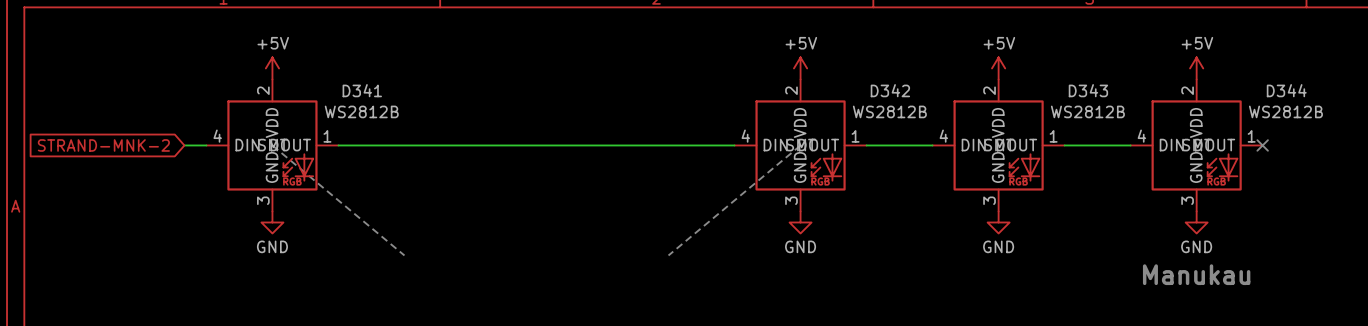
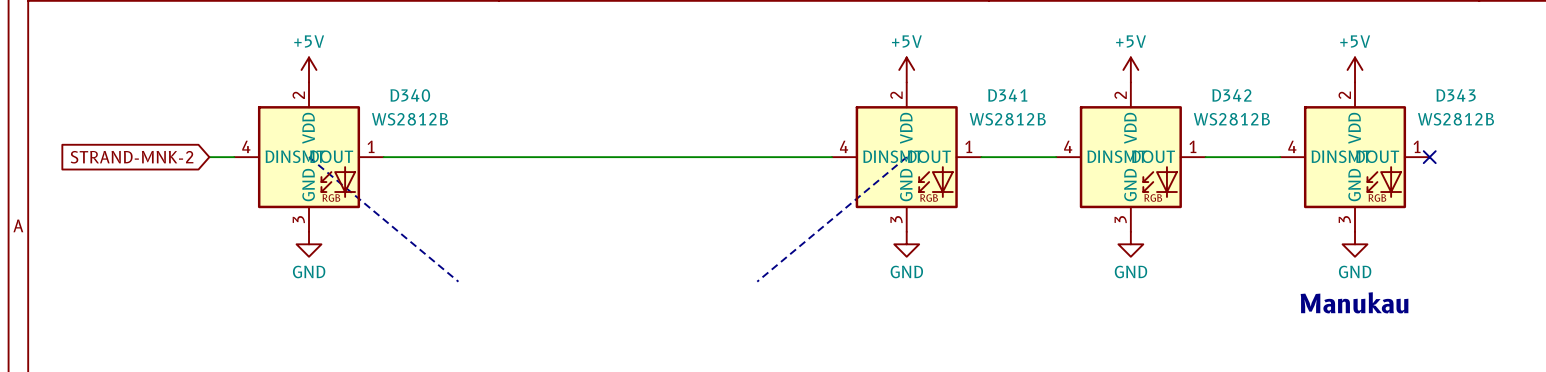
D341 name: D341 (362, 90) -> D340 (410, 95)
D342 name: D342 (890, 90) -> D341 (1007, 95)
D343 name: D343 (1088, 90) -> D342 (1231, 95)
D344 name: D344 (1286, 90) -> D343 (1456, 95)

